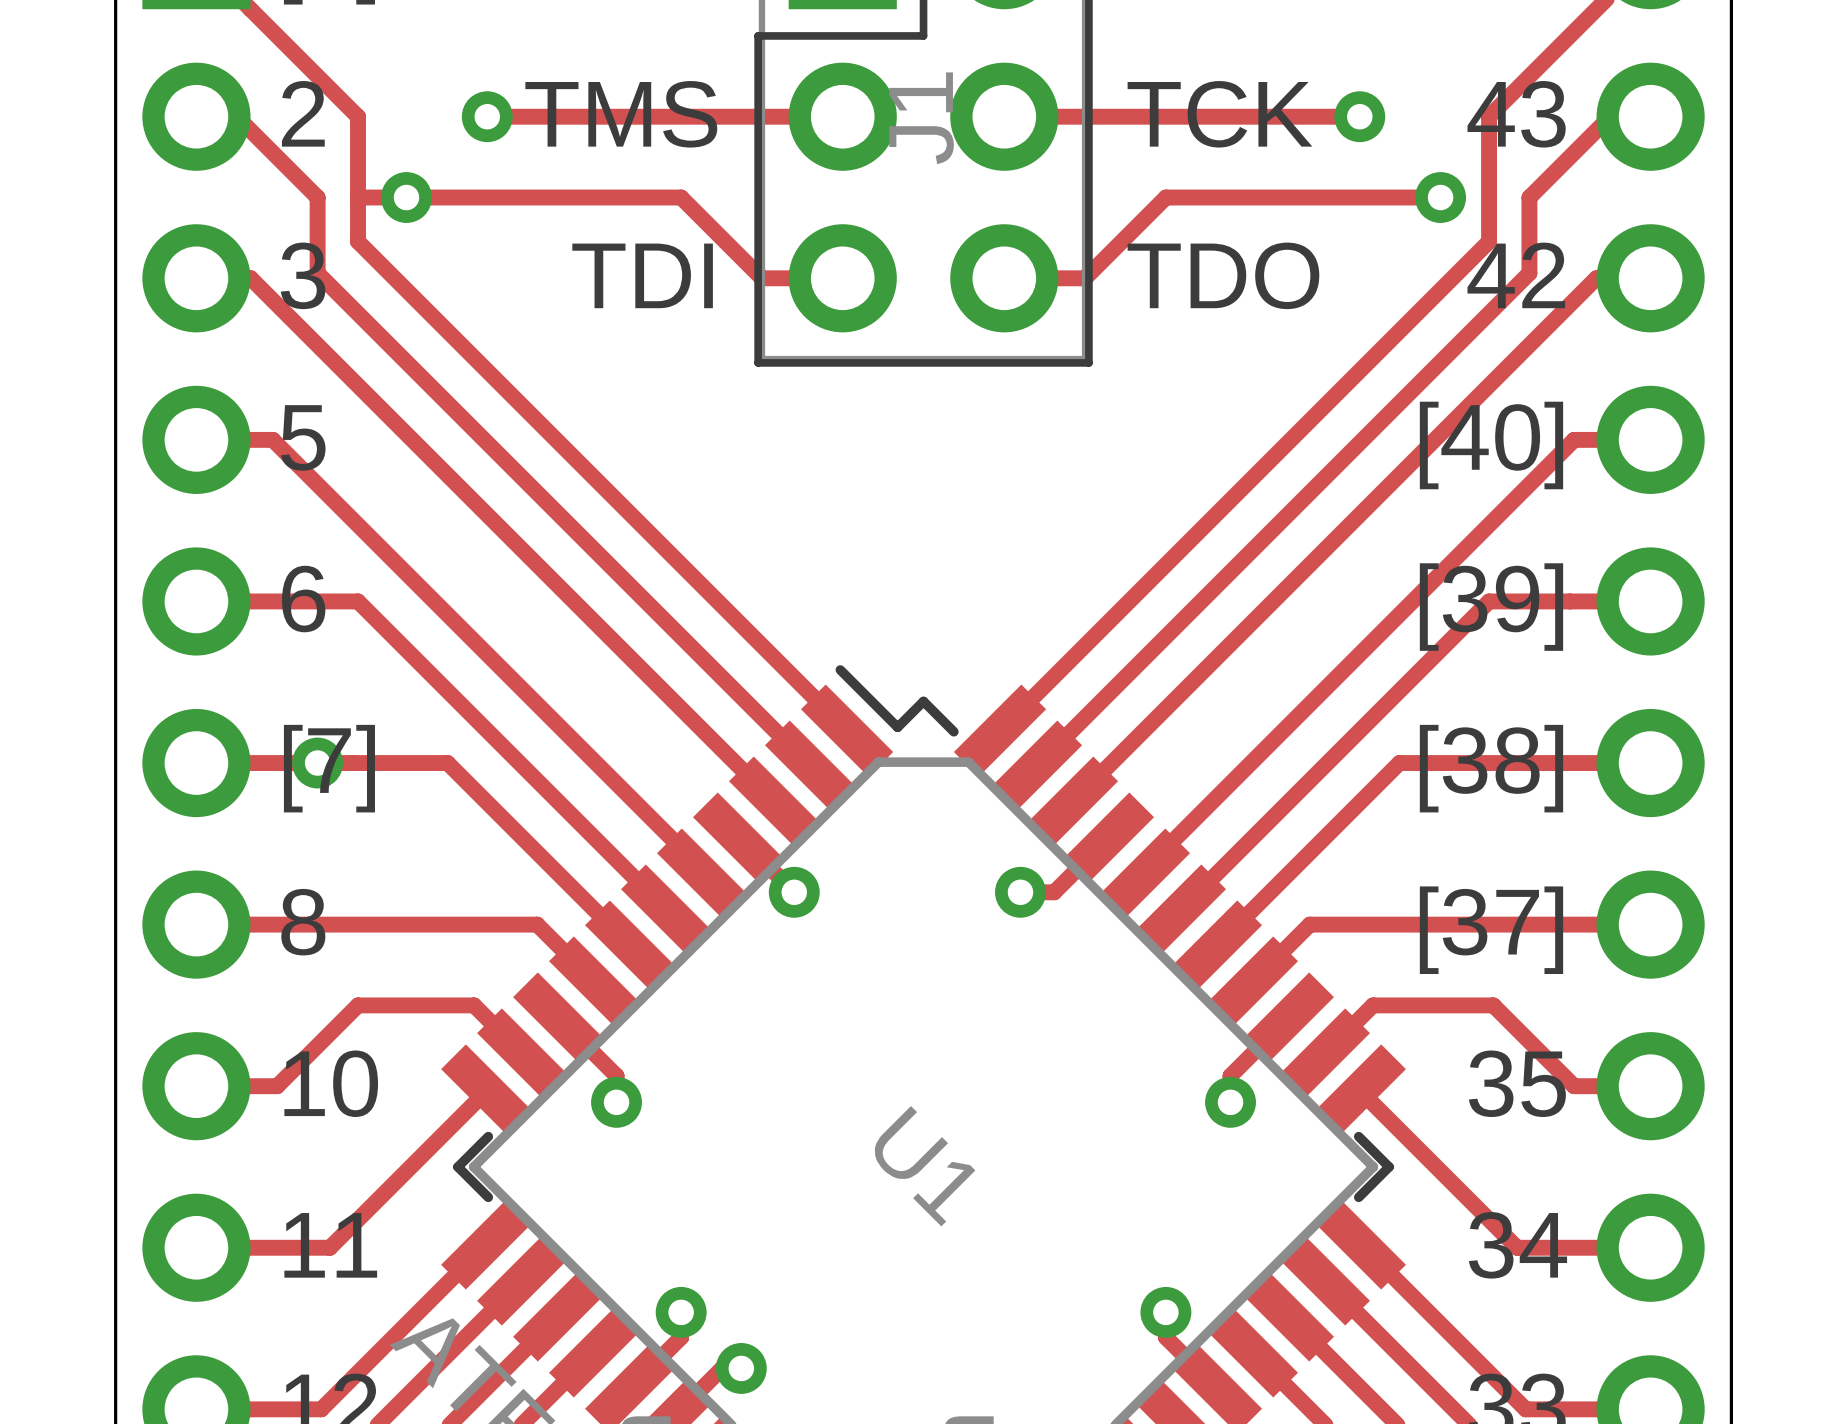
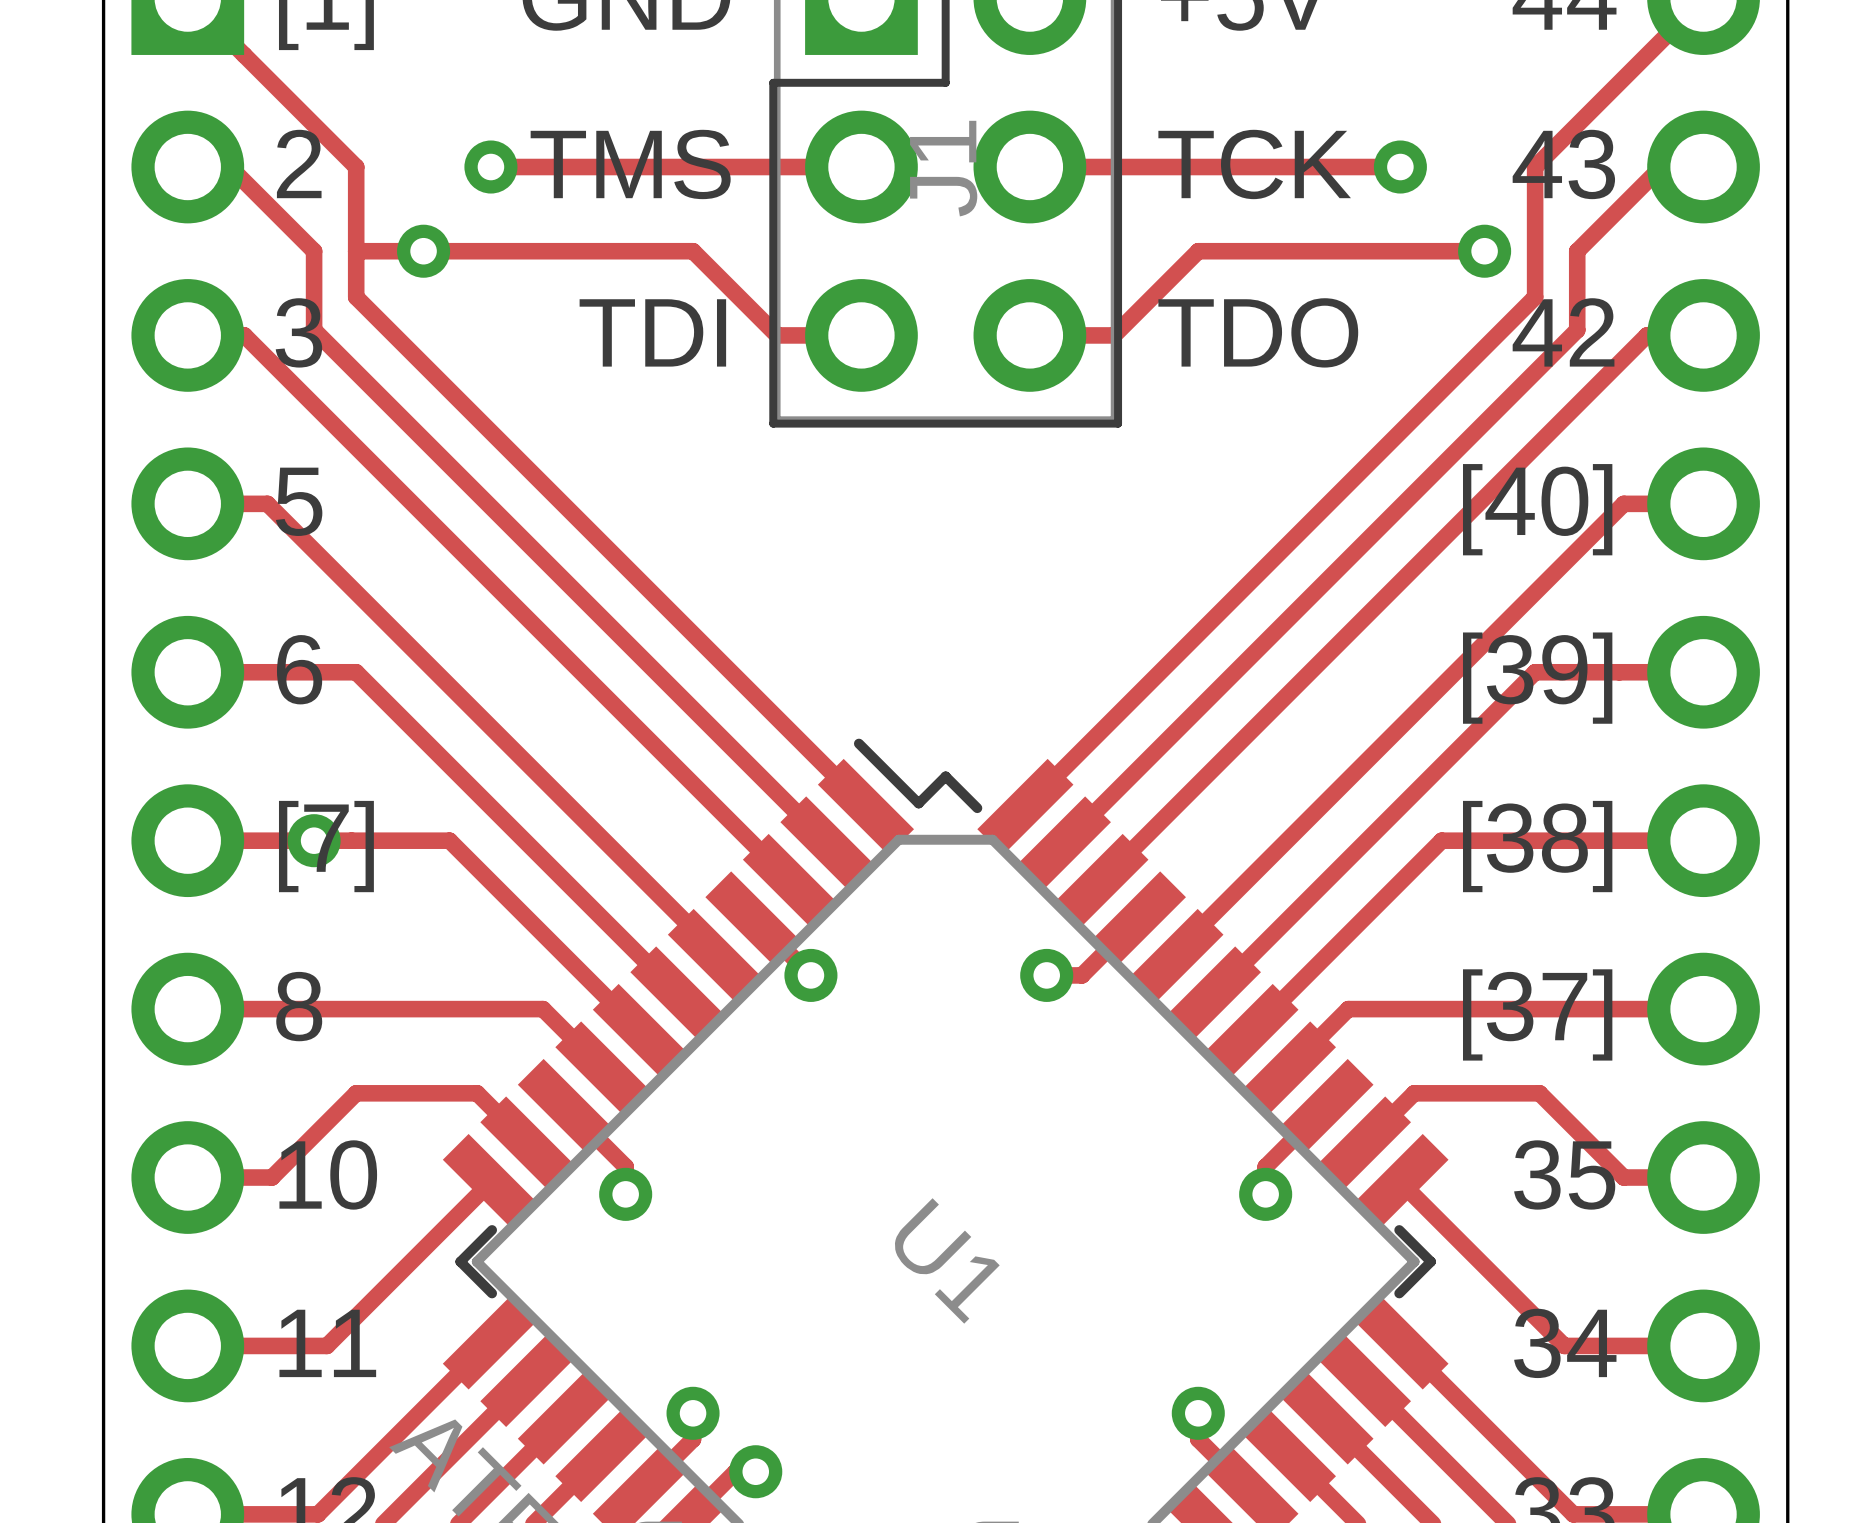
via position: (406, 197) -> (423, 251)

